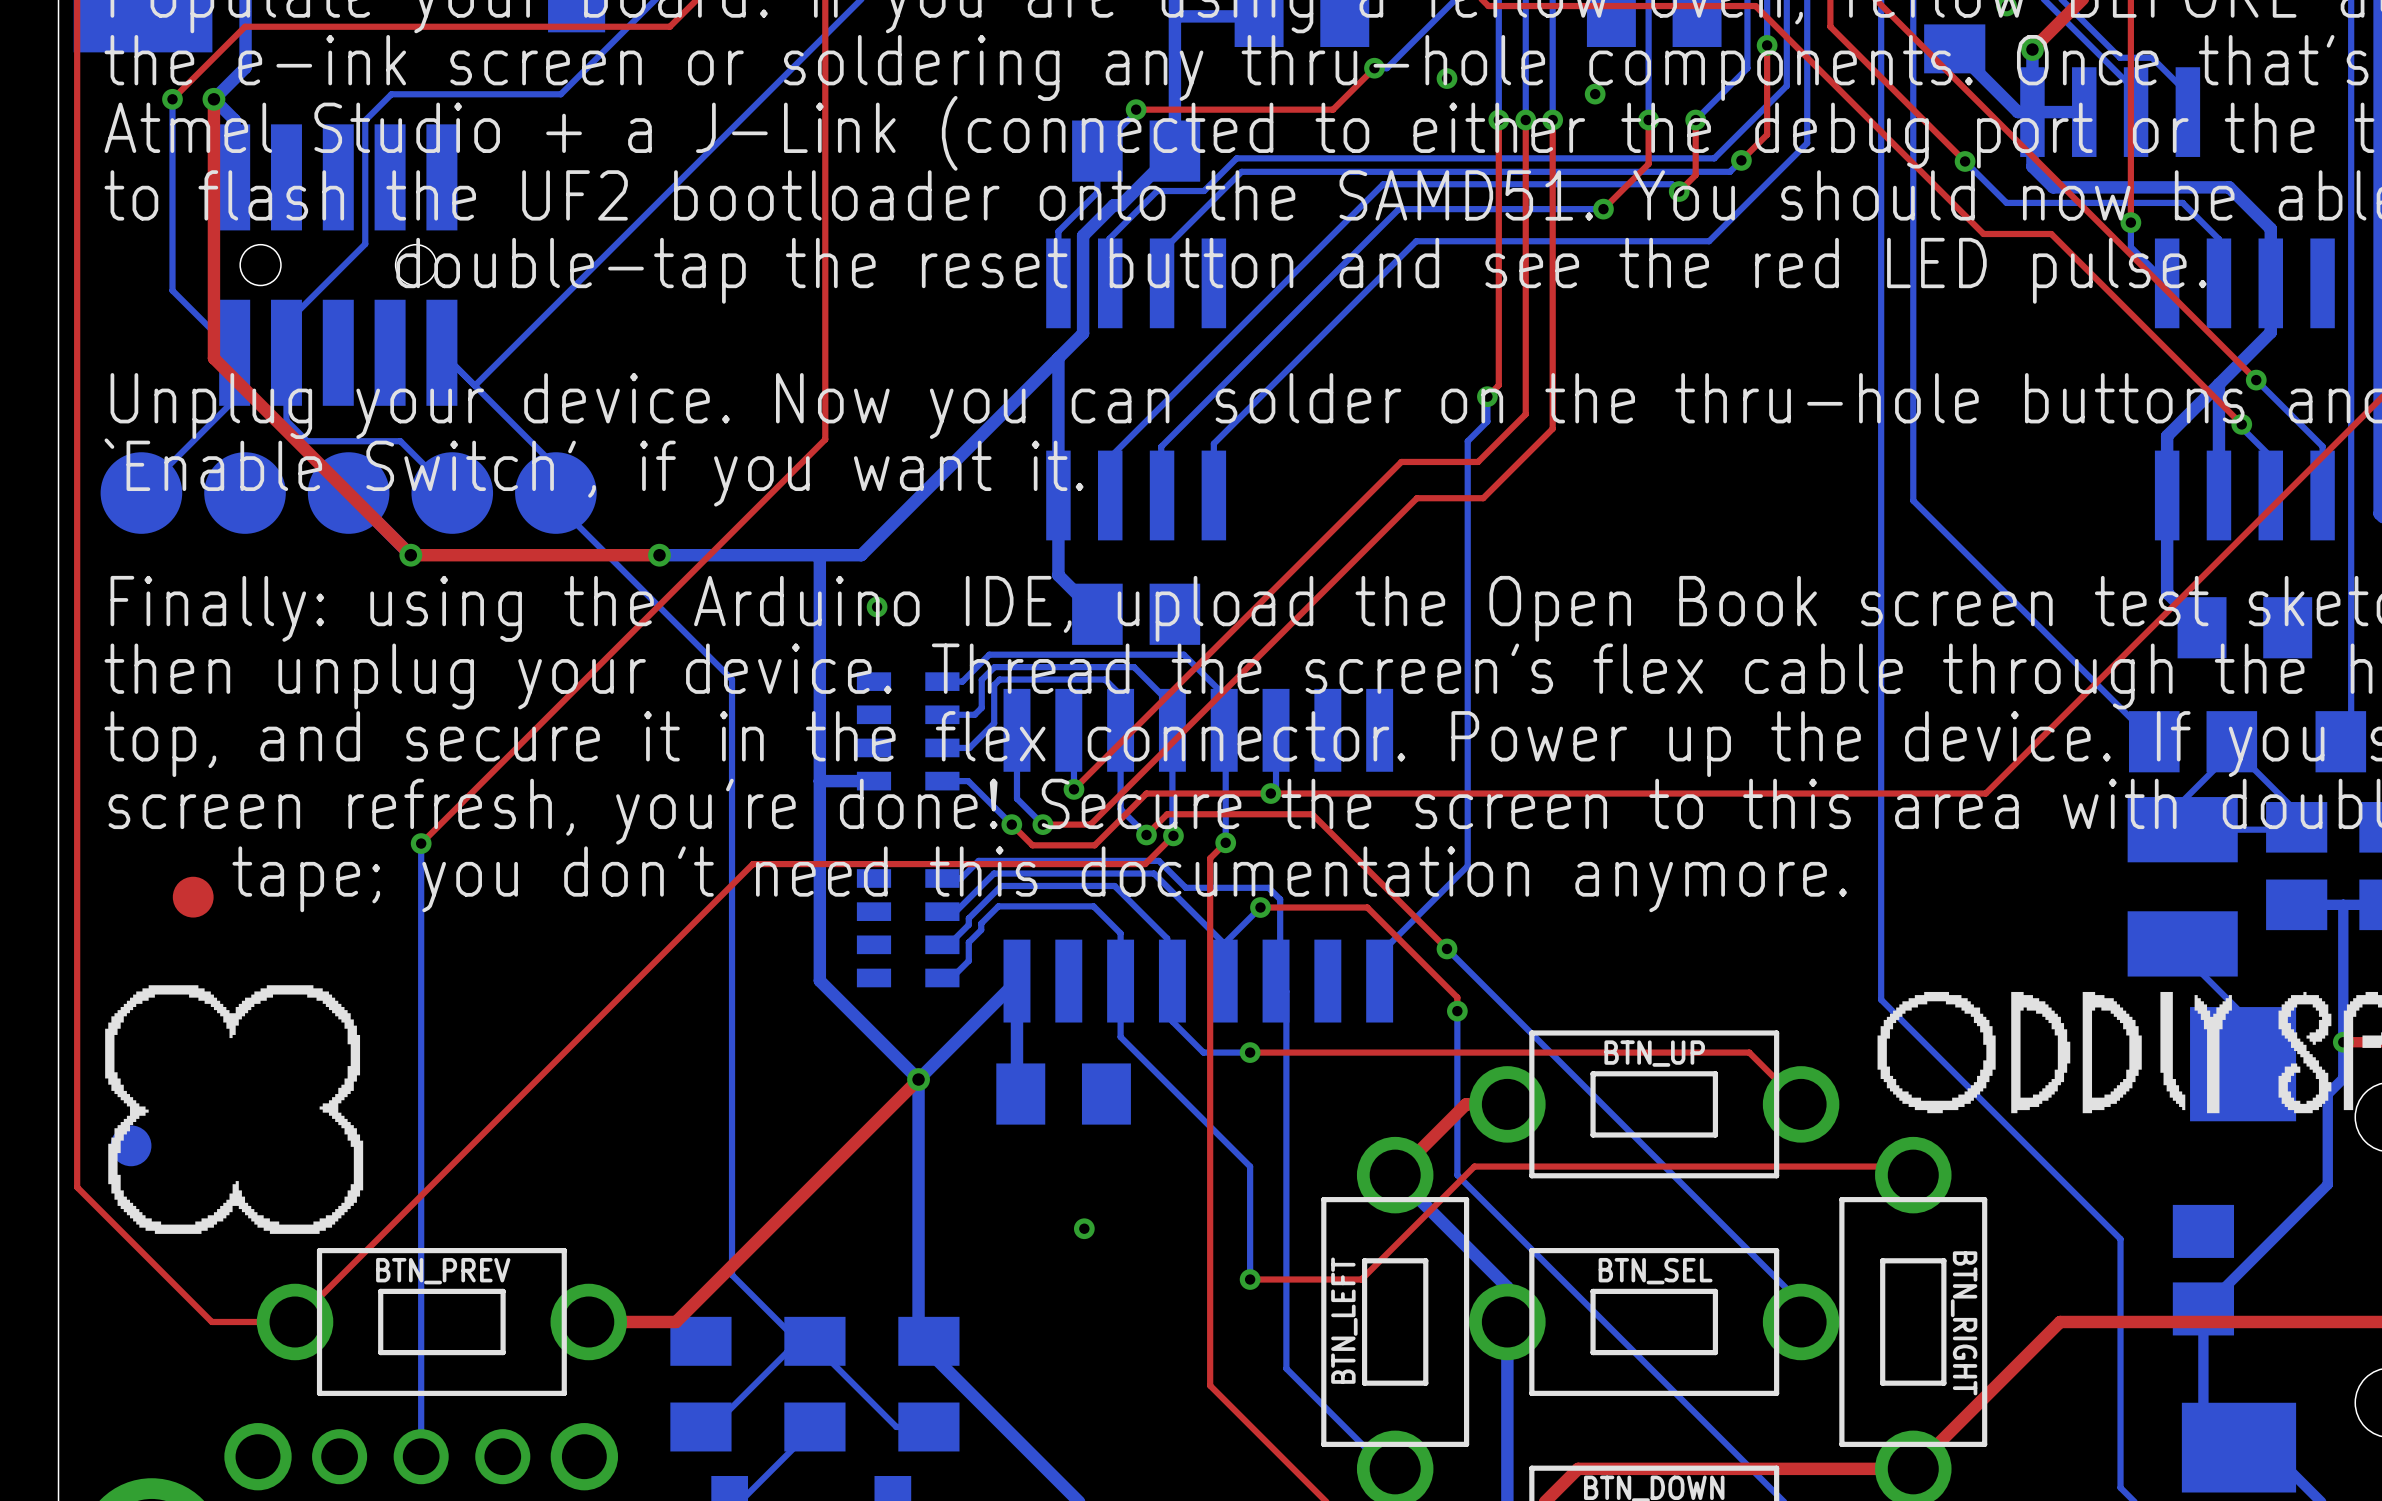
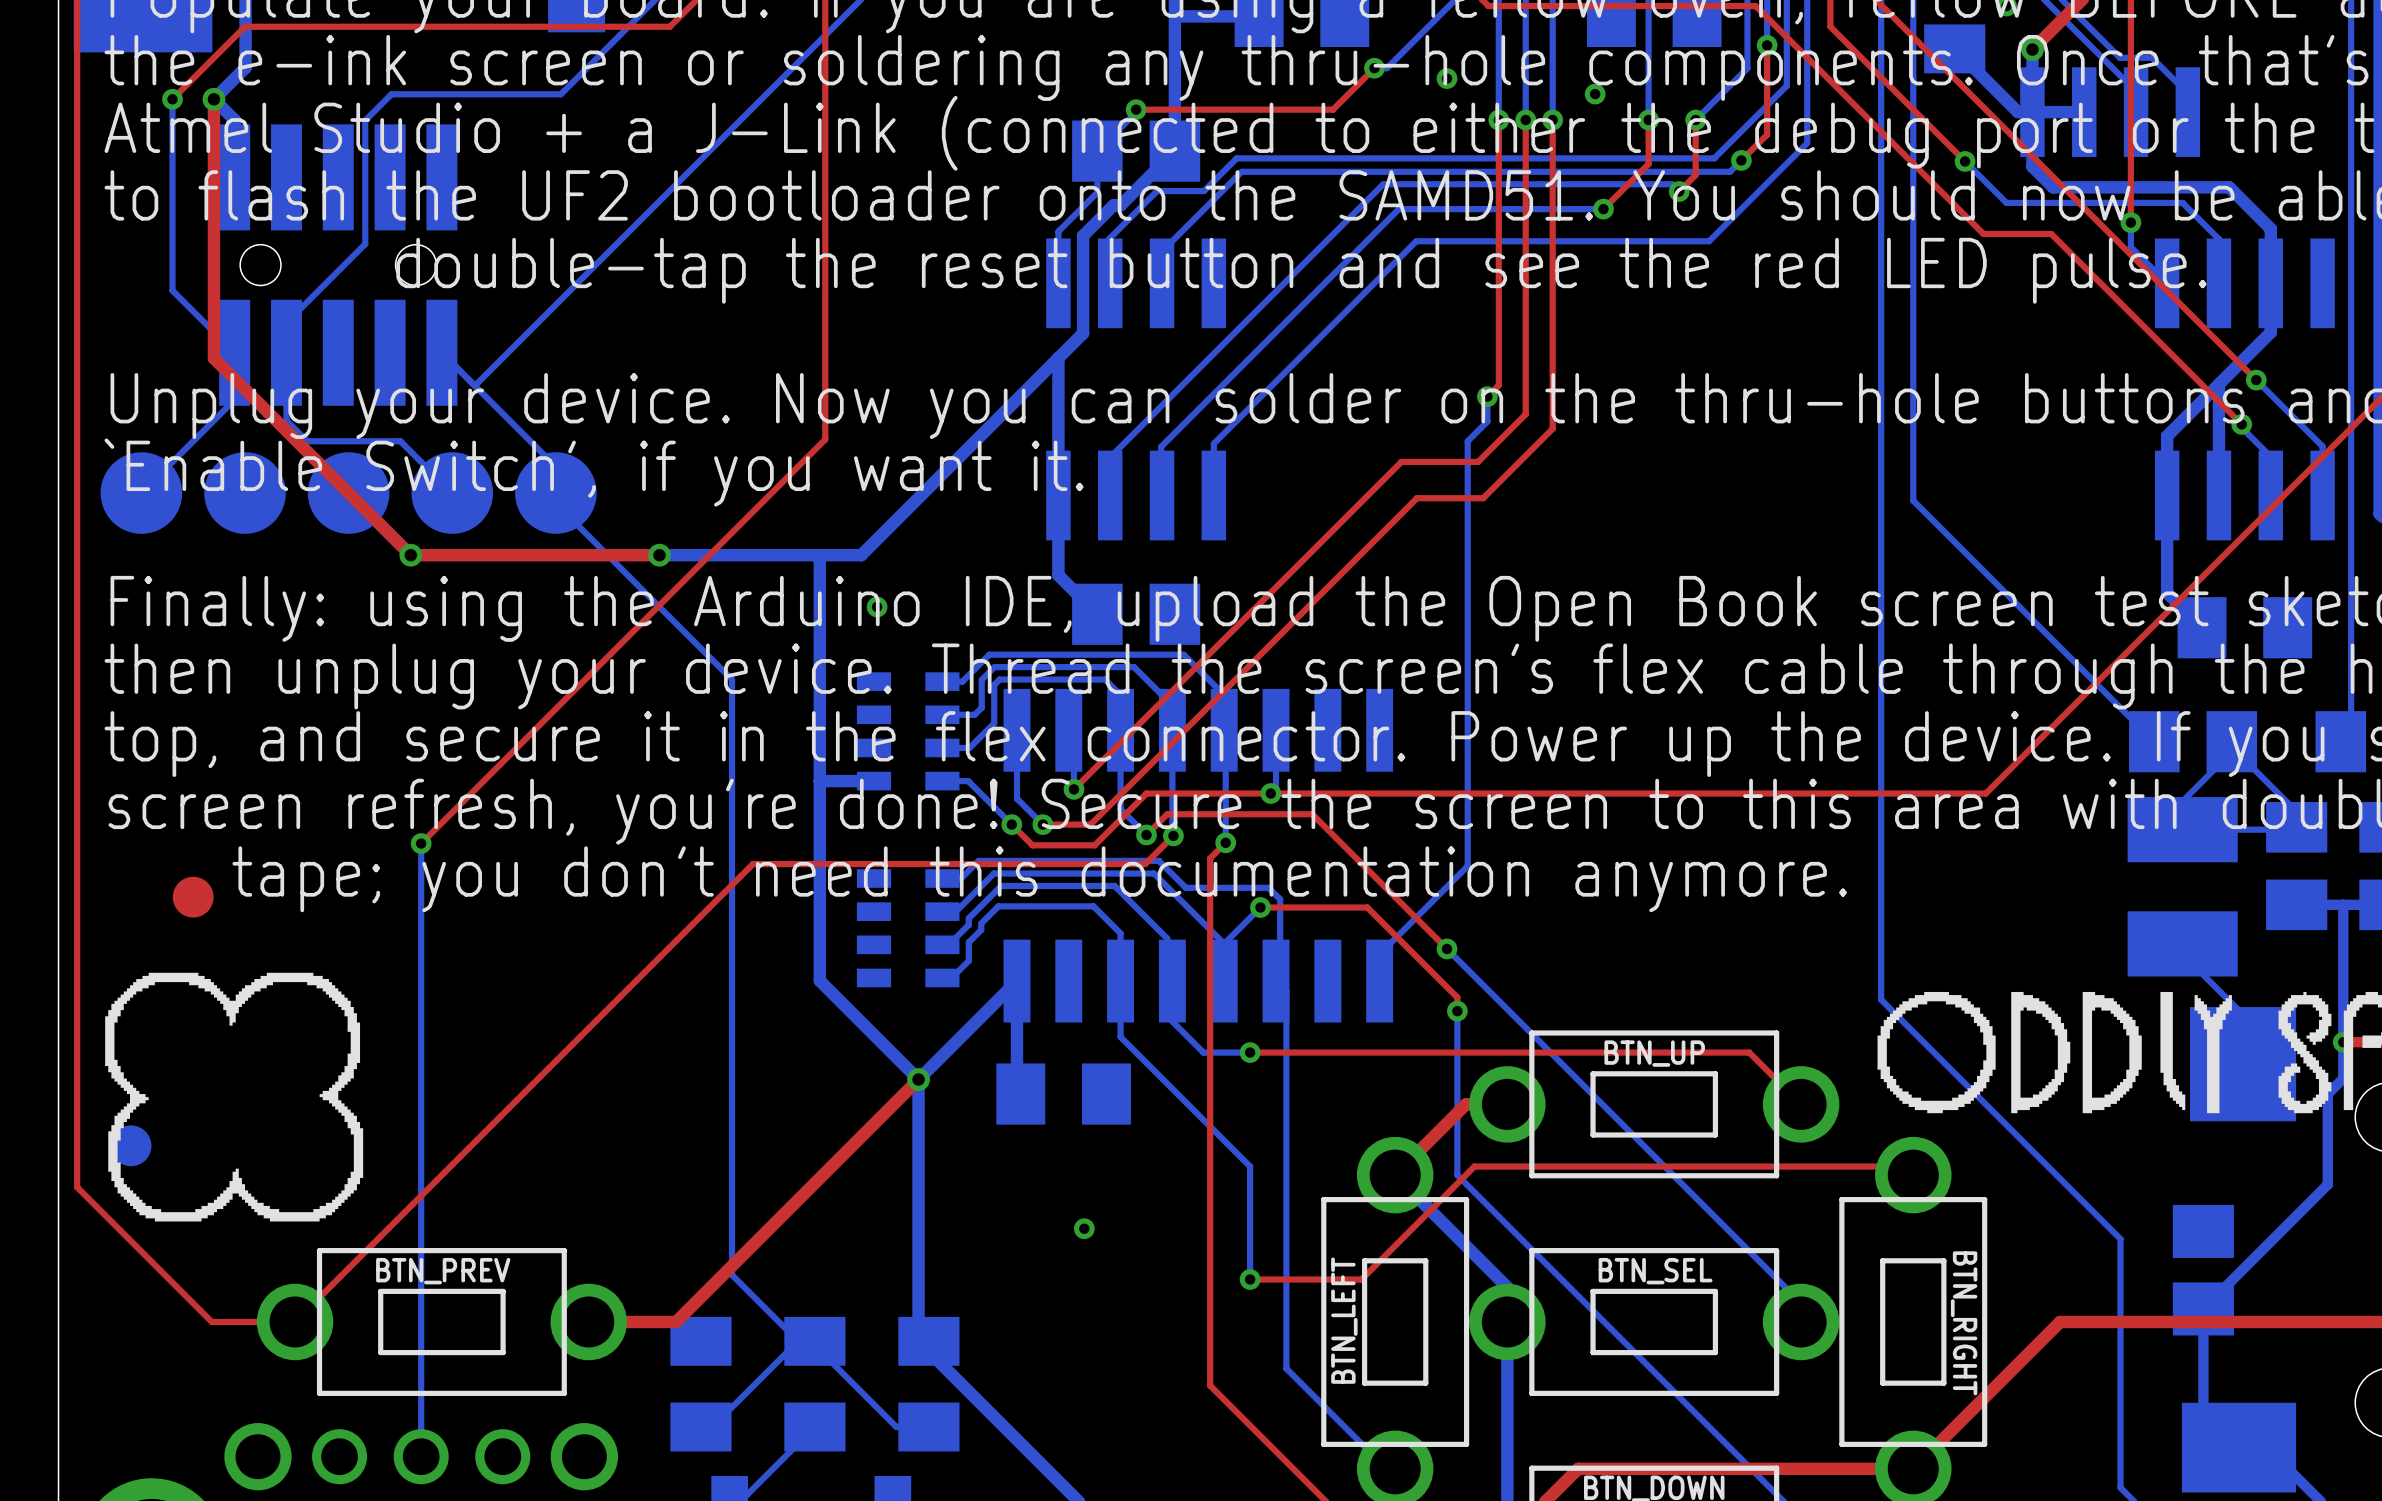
drawing position: (234, 1109) -> (234, 1097)

